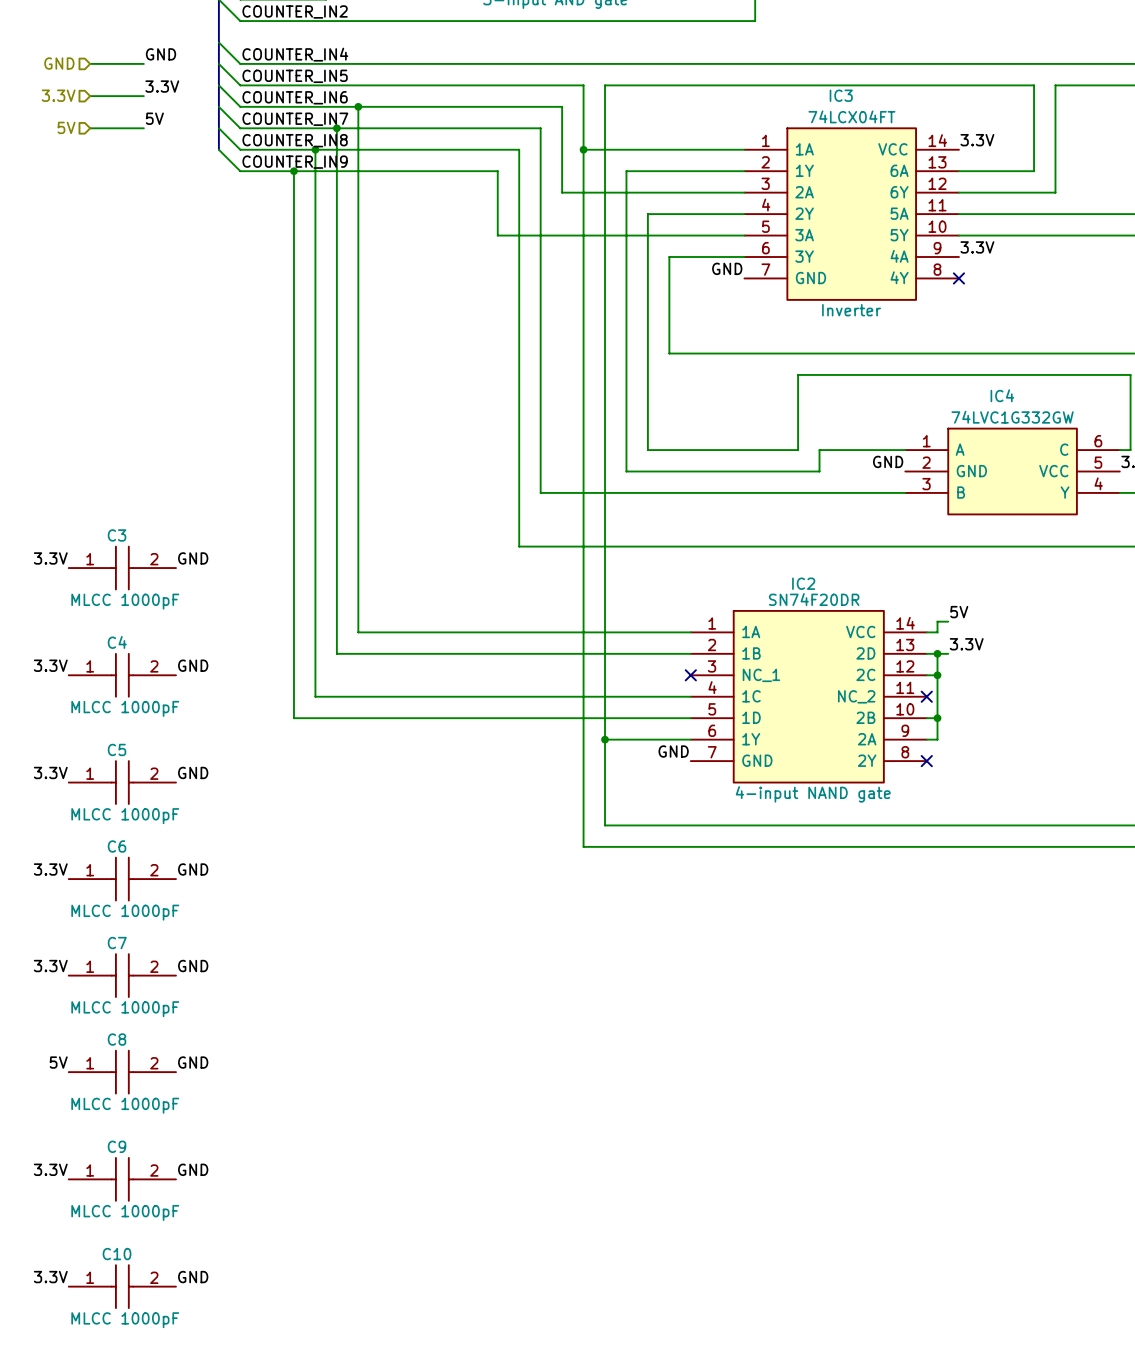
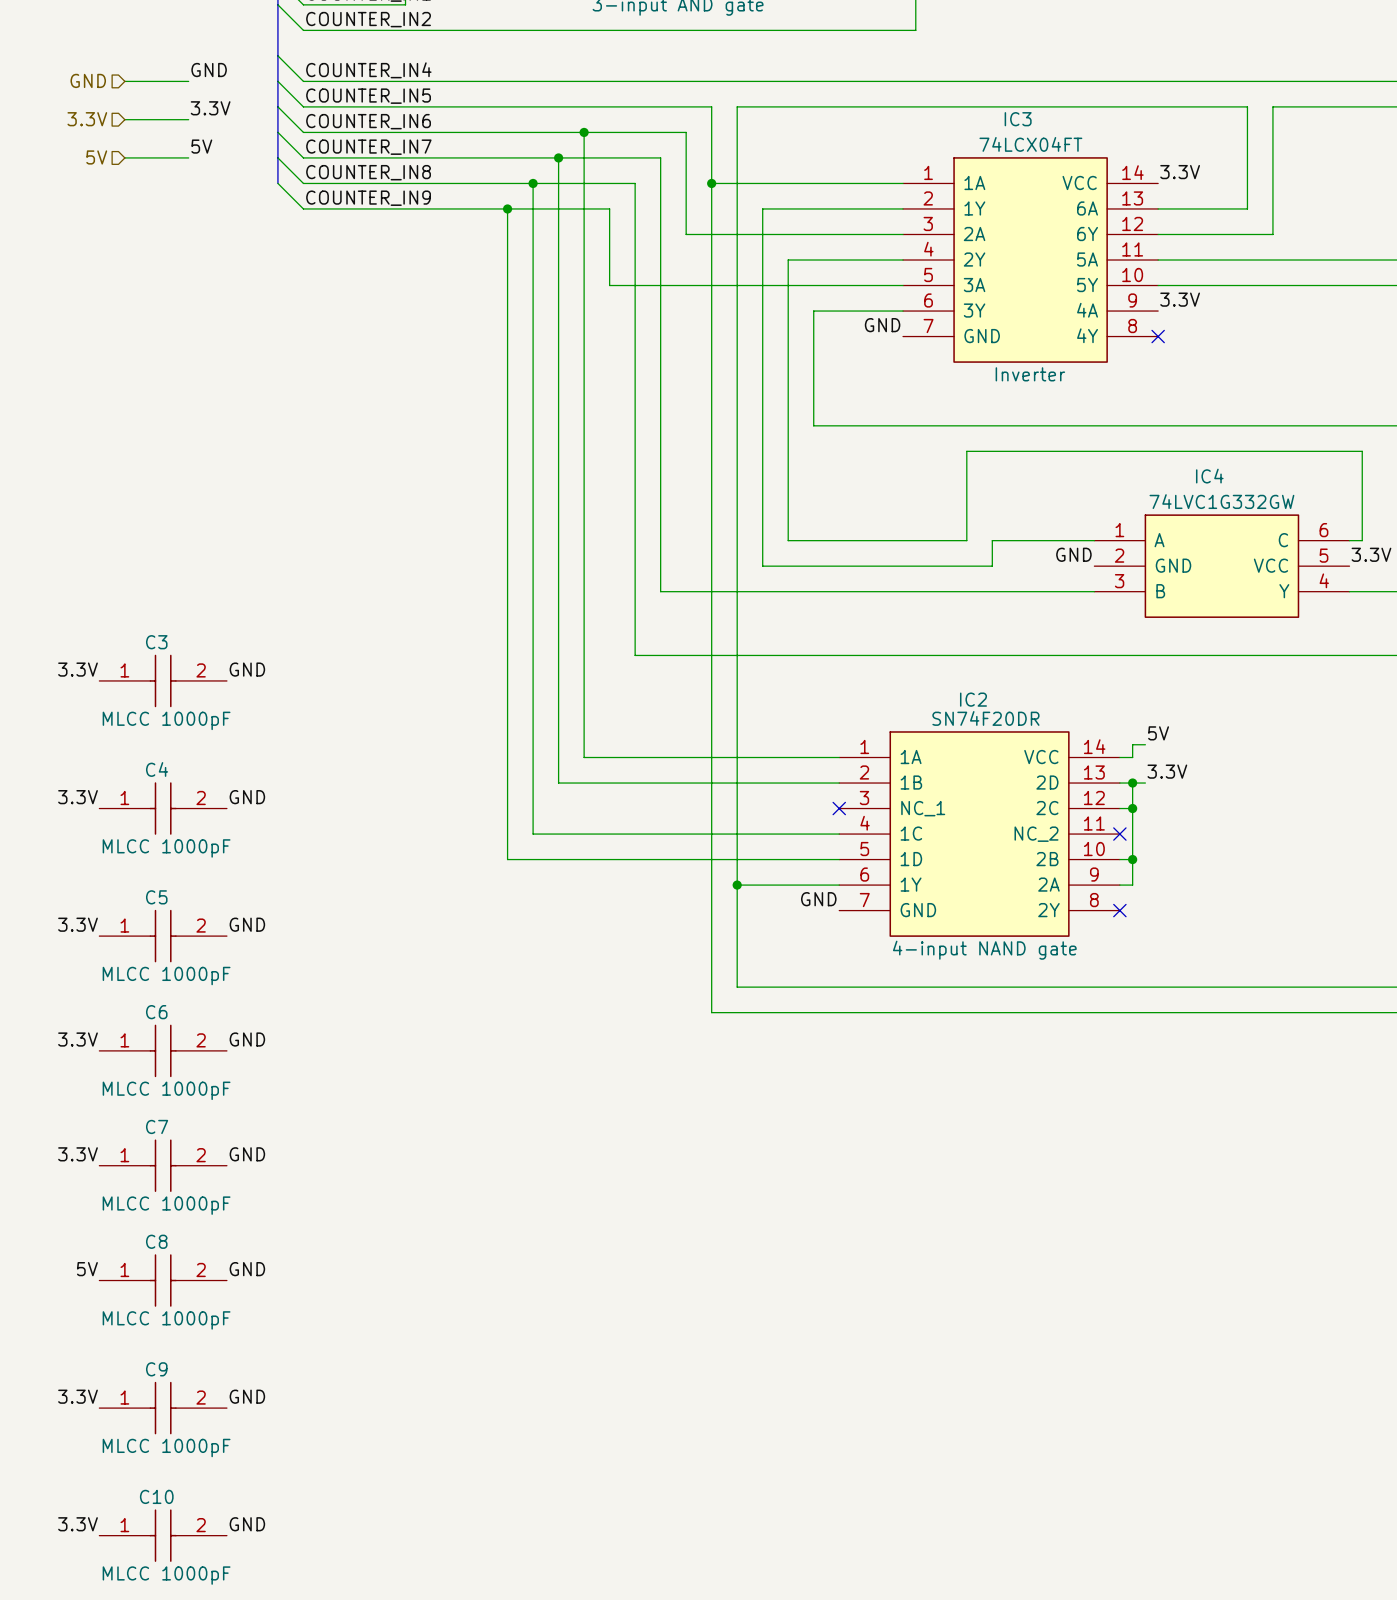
wire: (358, 106) (358, 632) (476, 632) -> (584, 132) (584, 757)
junction: (358, 106) -> none
junction: none -> (584, 132)
wire: (336, 128) (336, 653) (454, 653) -> (558, 157) (558, 783)
junction: (336, 128) -> none
junction: none -> (558, 157)
wire: (315, 149) (315, 696) (433, 696) -> (533, 183) (533, 834)
junction: (315, 149) -> none
junction: none -> (533, 183)
wire: (293, 171) (293, 718) (411, 718) -> (507, 208) (507, 859)
junction: (293, 171) -> none
junction: none -> (507, 208)

